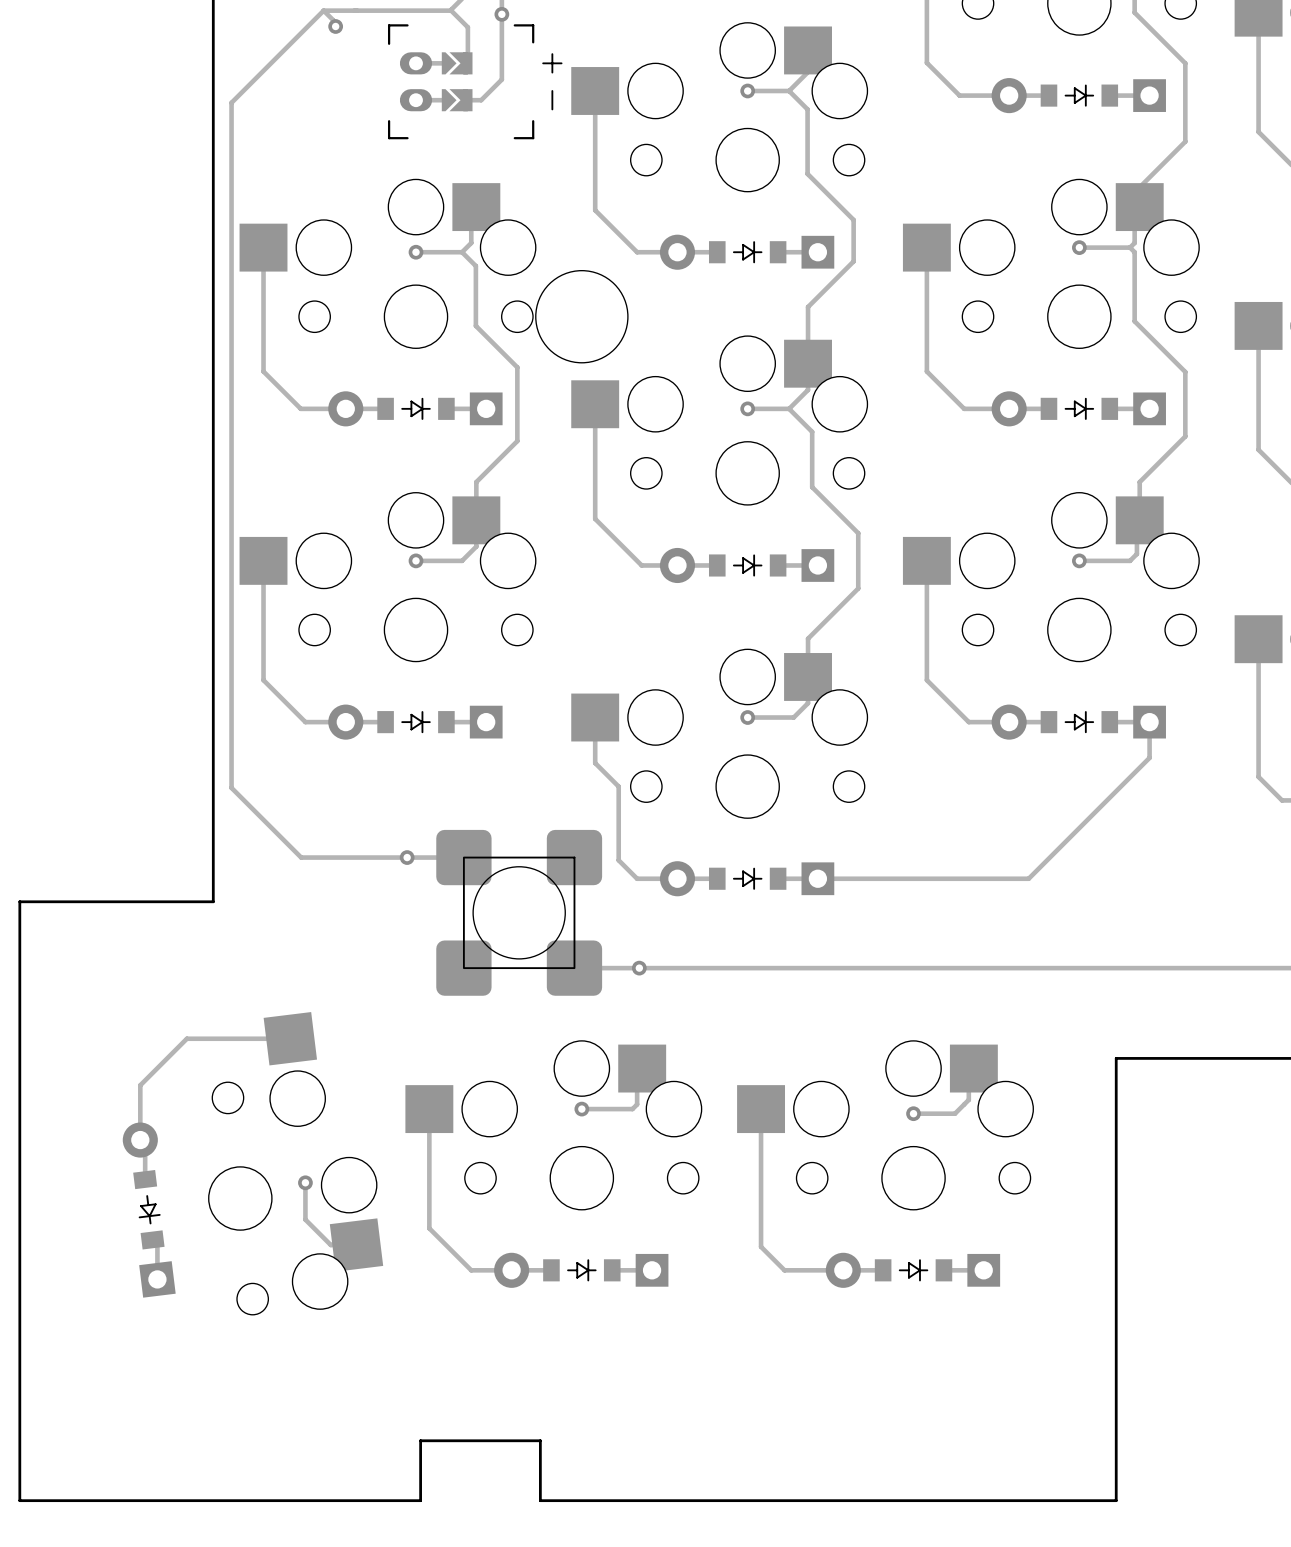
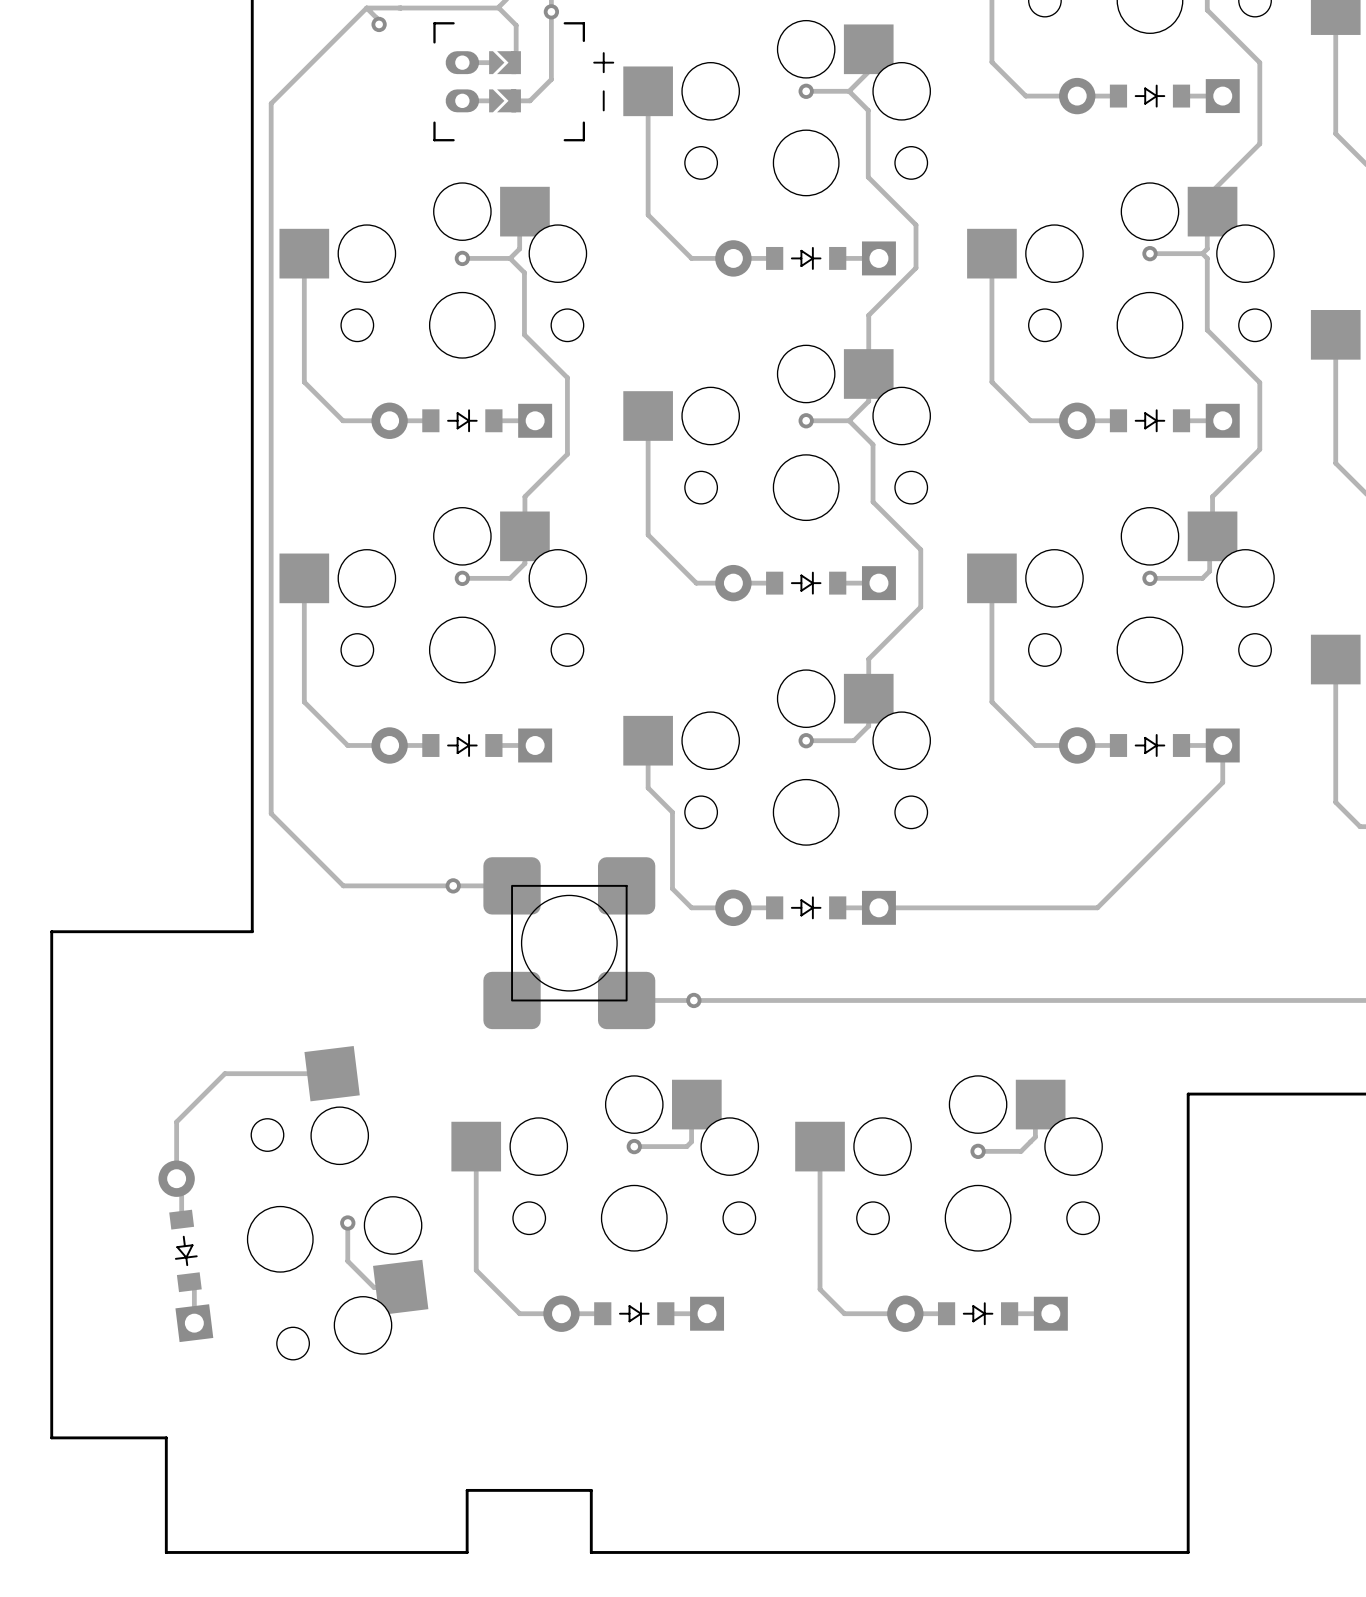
round board edge: [535, 270, 629, 364] -> none
board edge: (19, 1390) (19, 1500) (130, 1500) -> (51, 1437) (166, 1437) (166, 1552)

